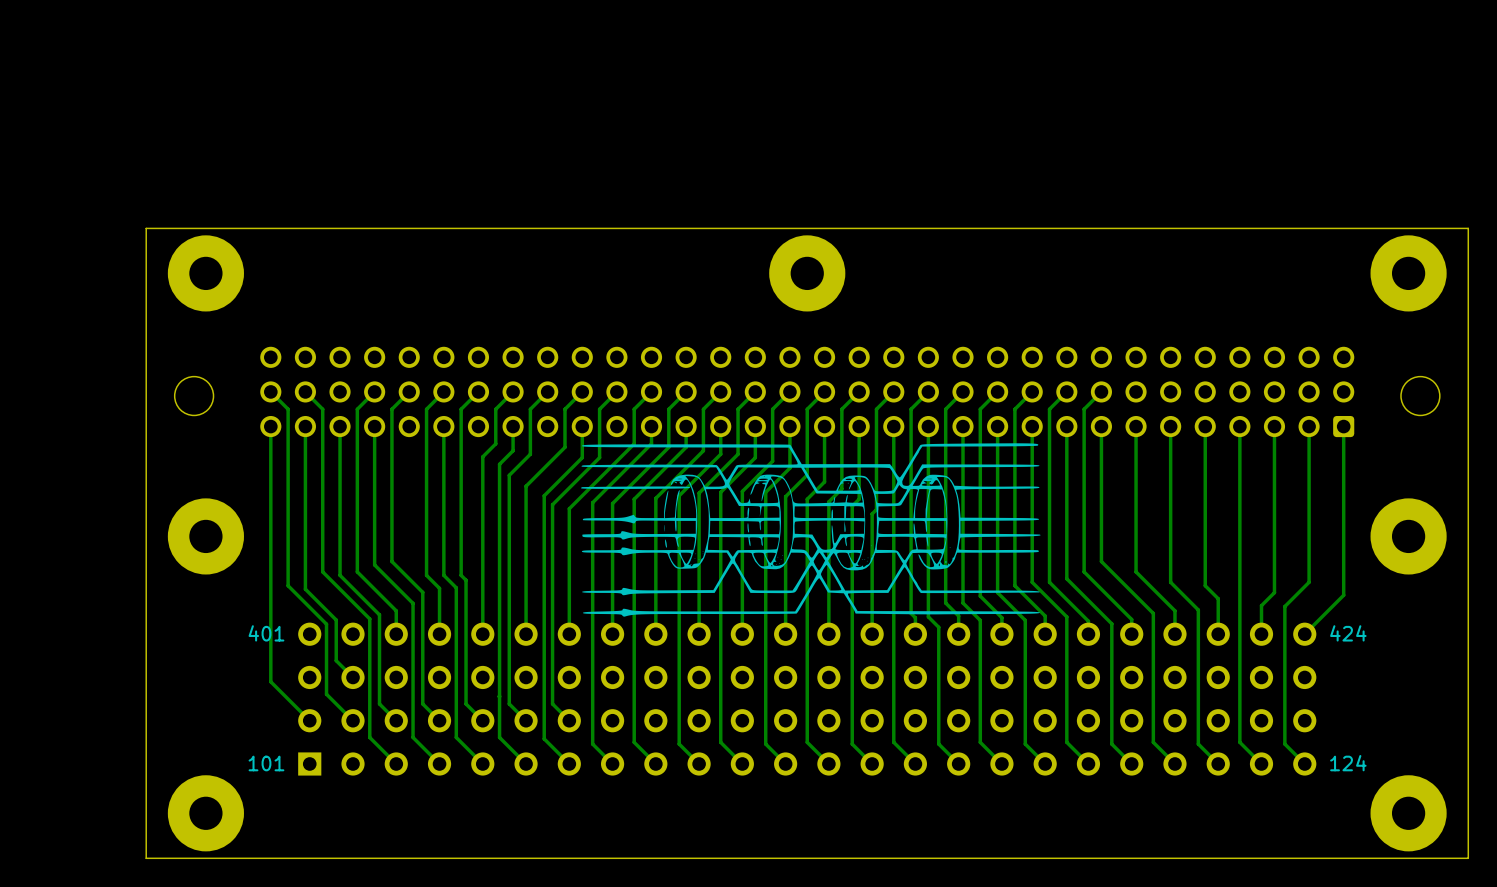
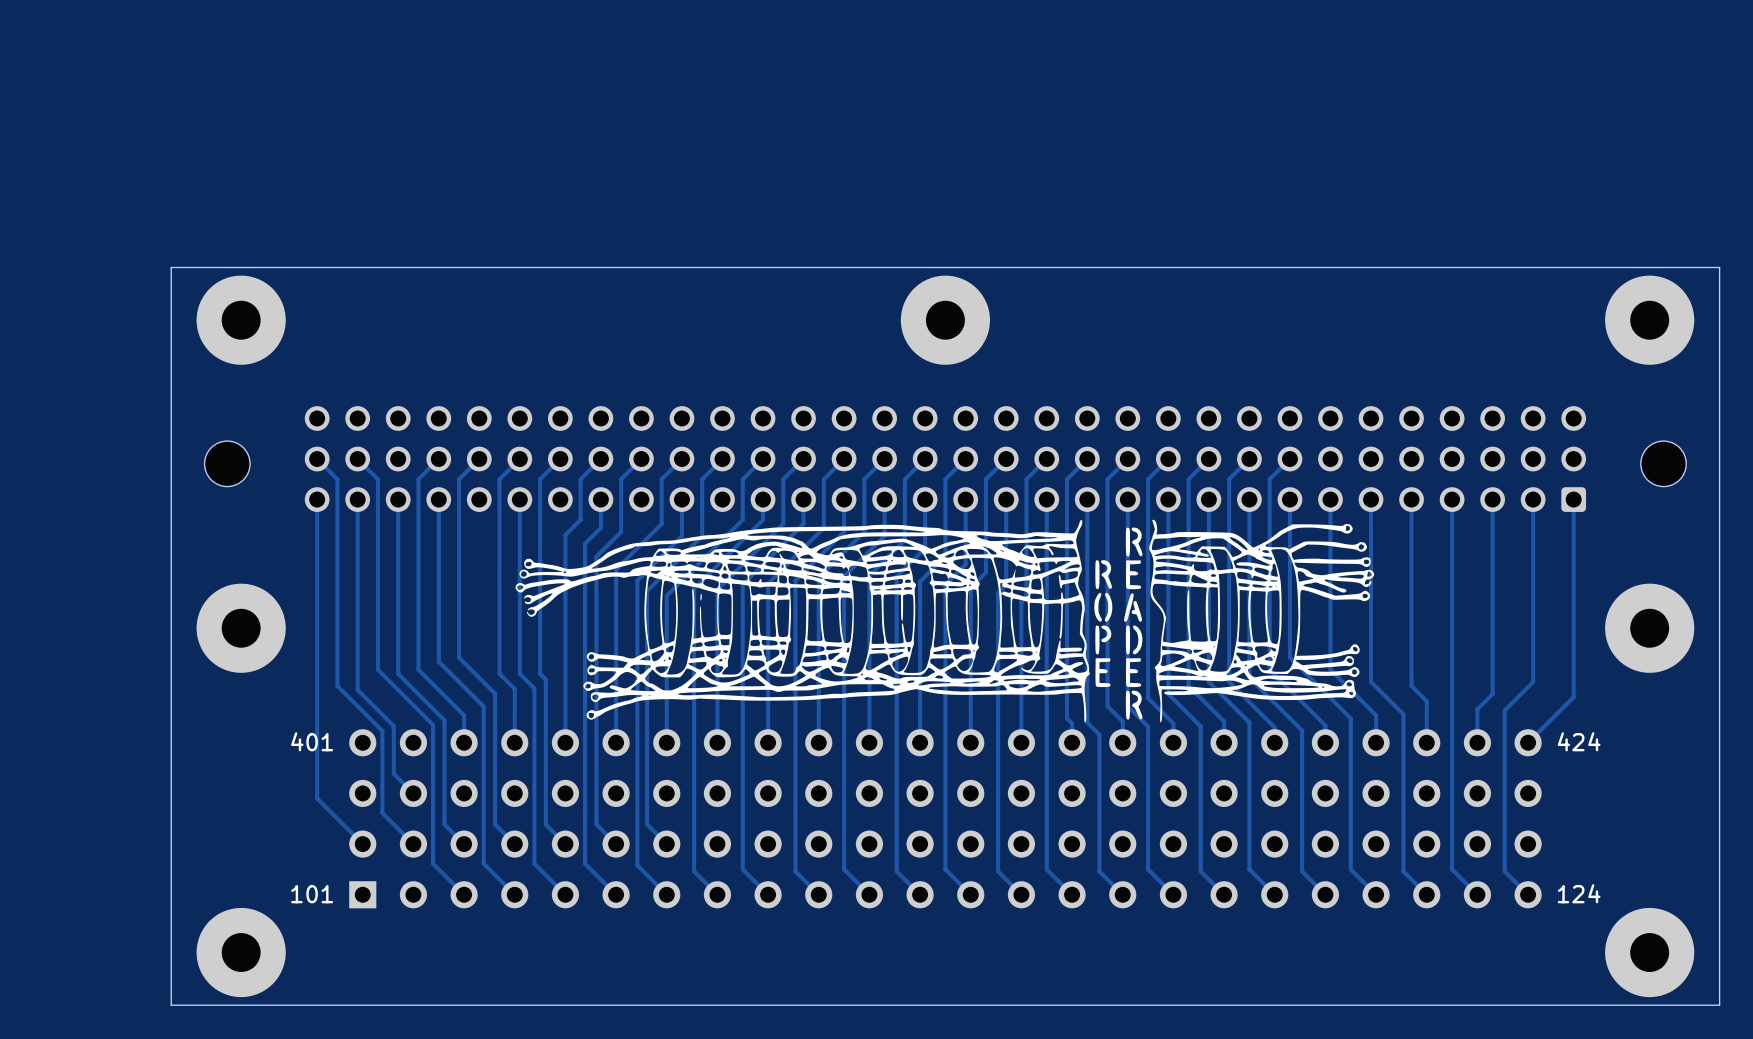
drawing shape: [581, 443, 1041, 617] -> [515, 519, 1375, 723]

